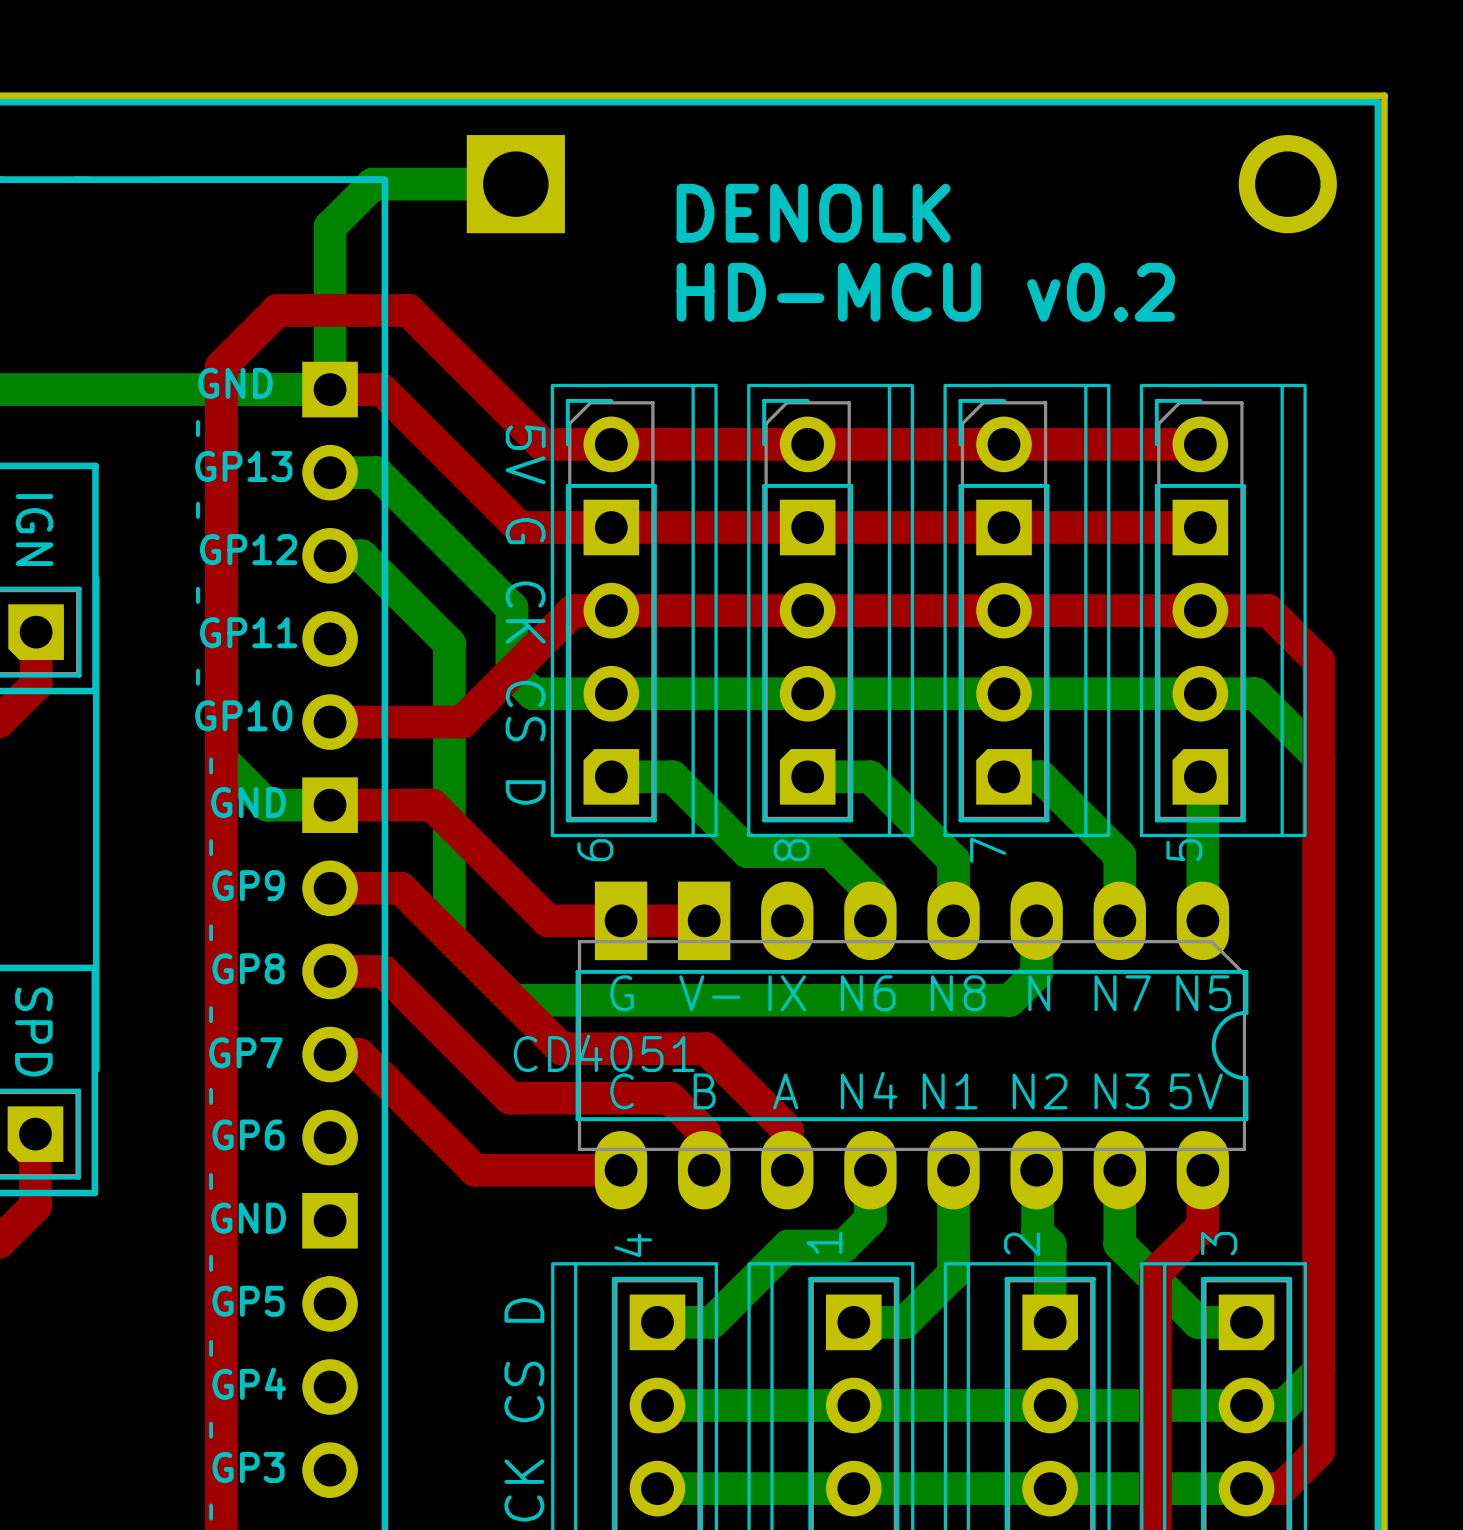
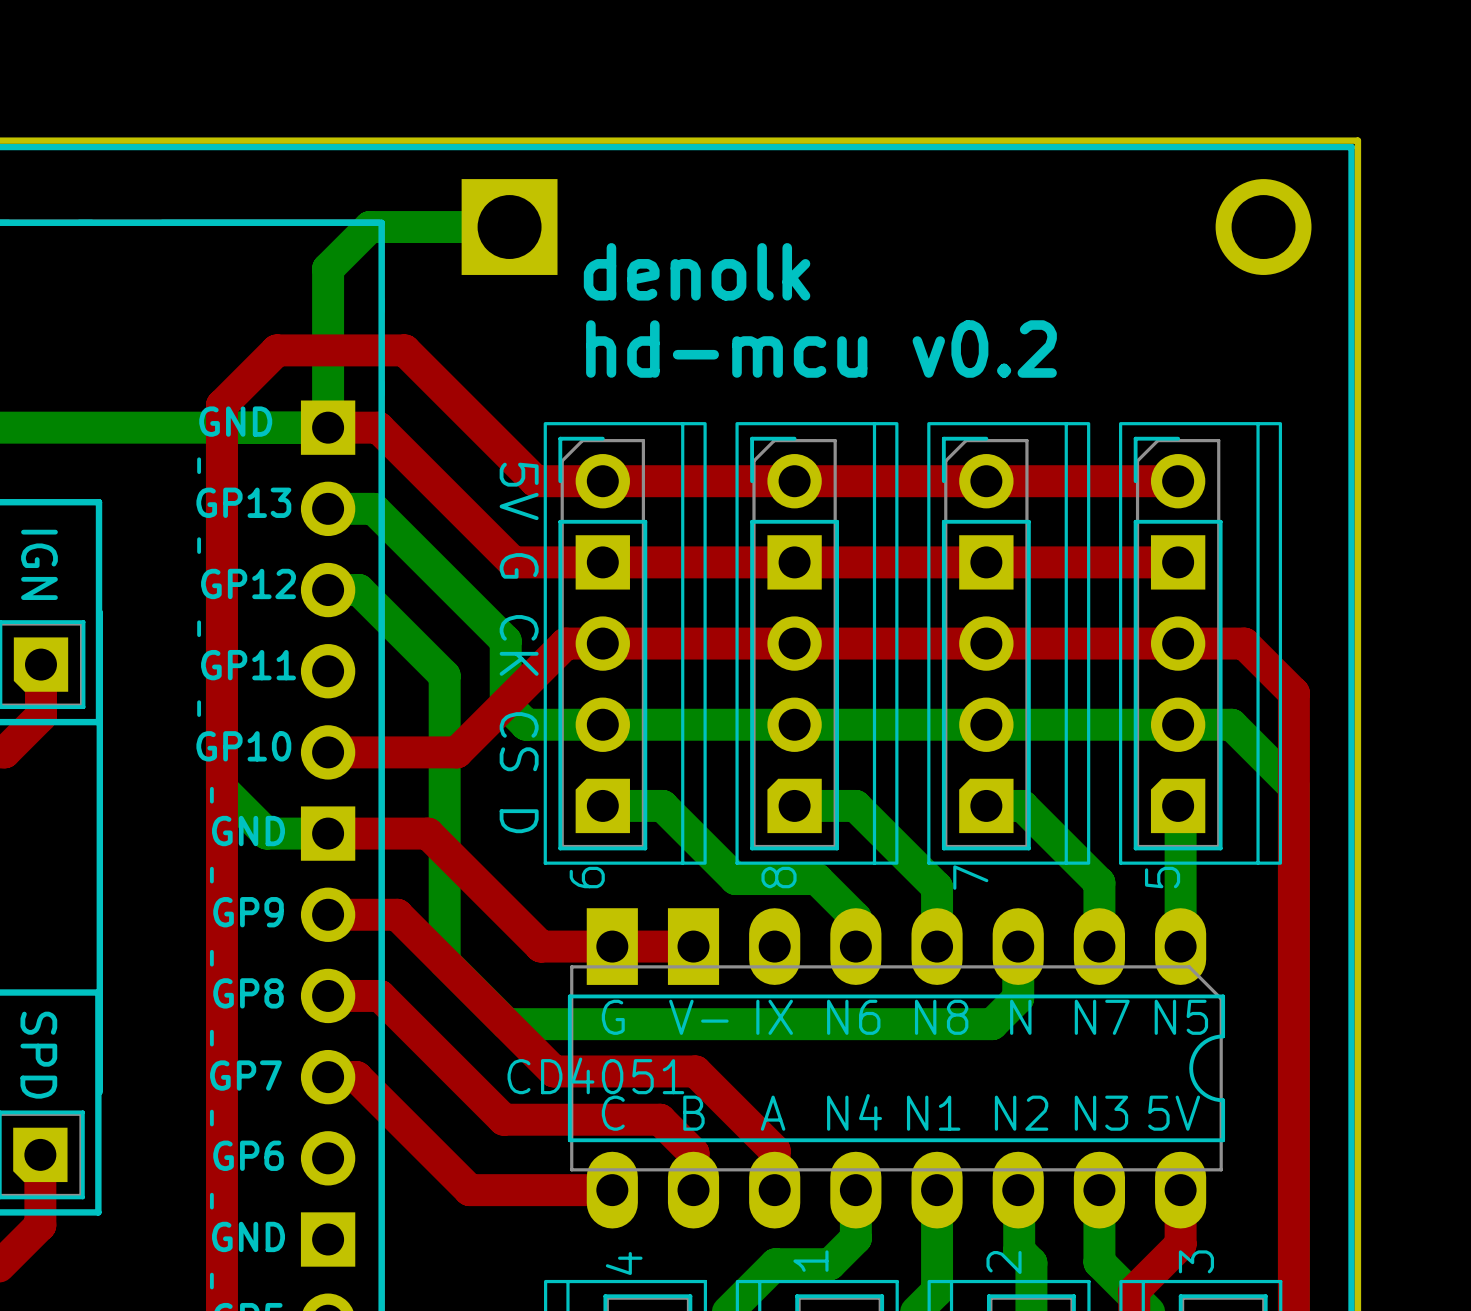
text: DENOLK (813, 213) -> none
text: none -> denolk (697, 271)
text: HD-MCU v0.2 (925, 292) -> none
text: none -> hd-mcu v0.2 (821, 349)

